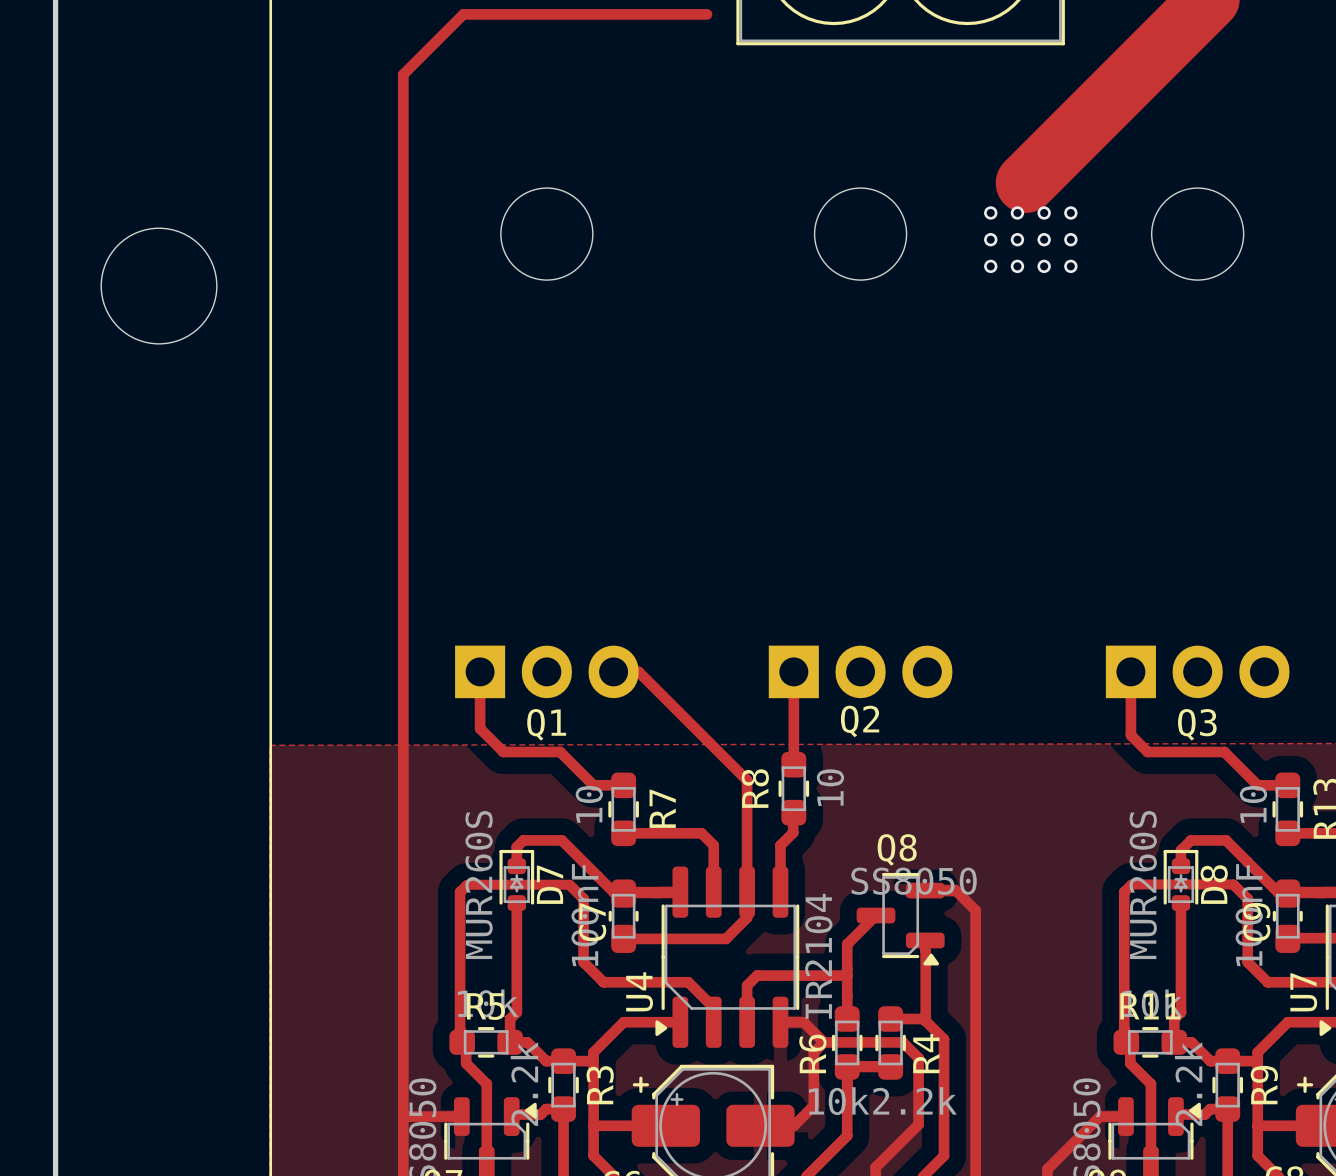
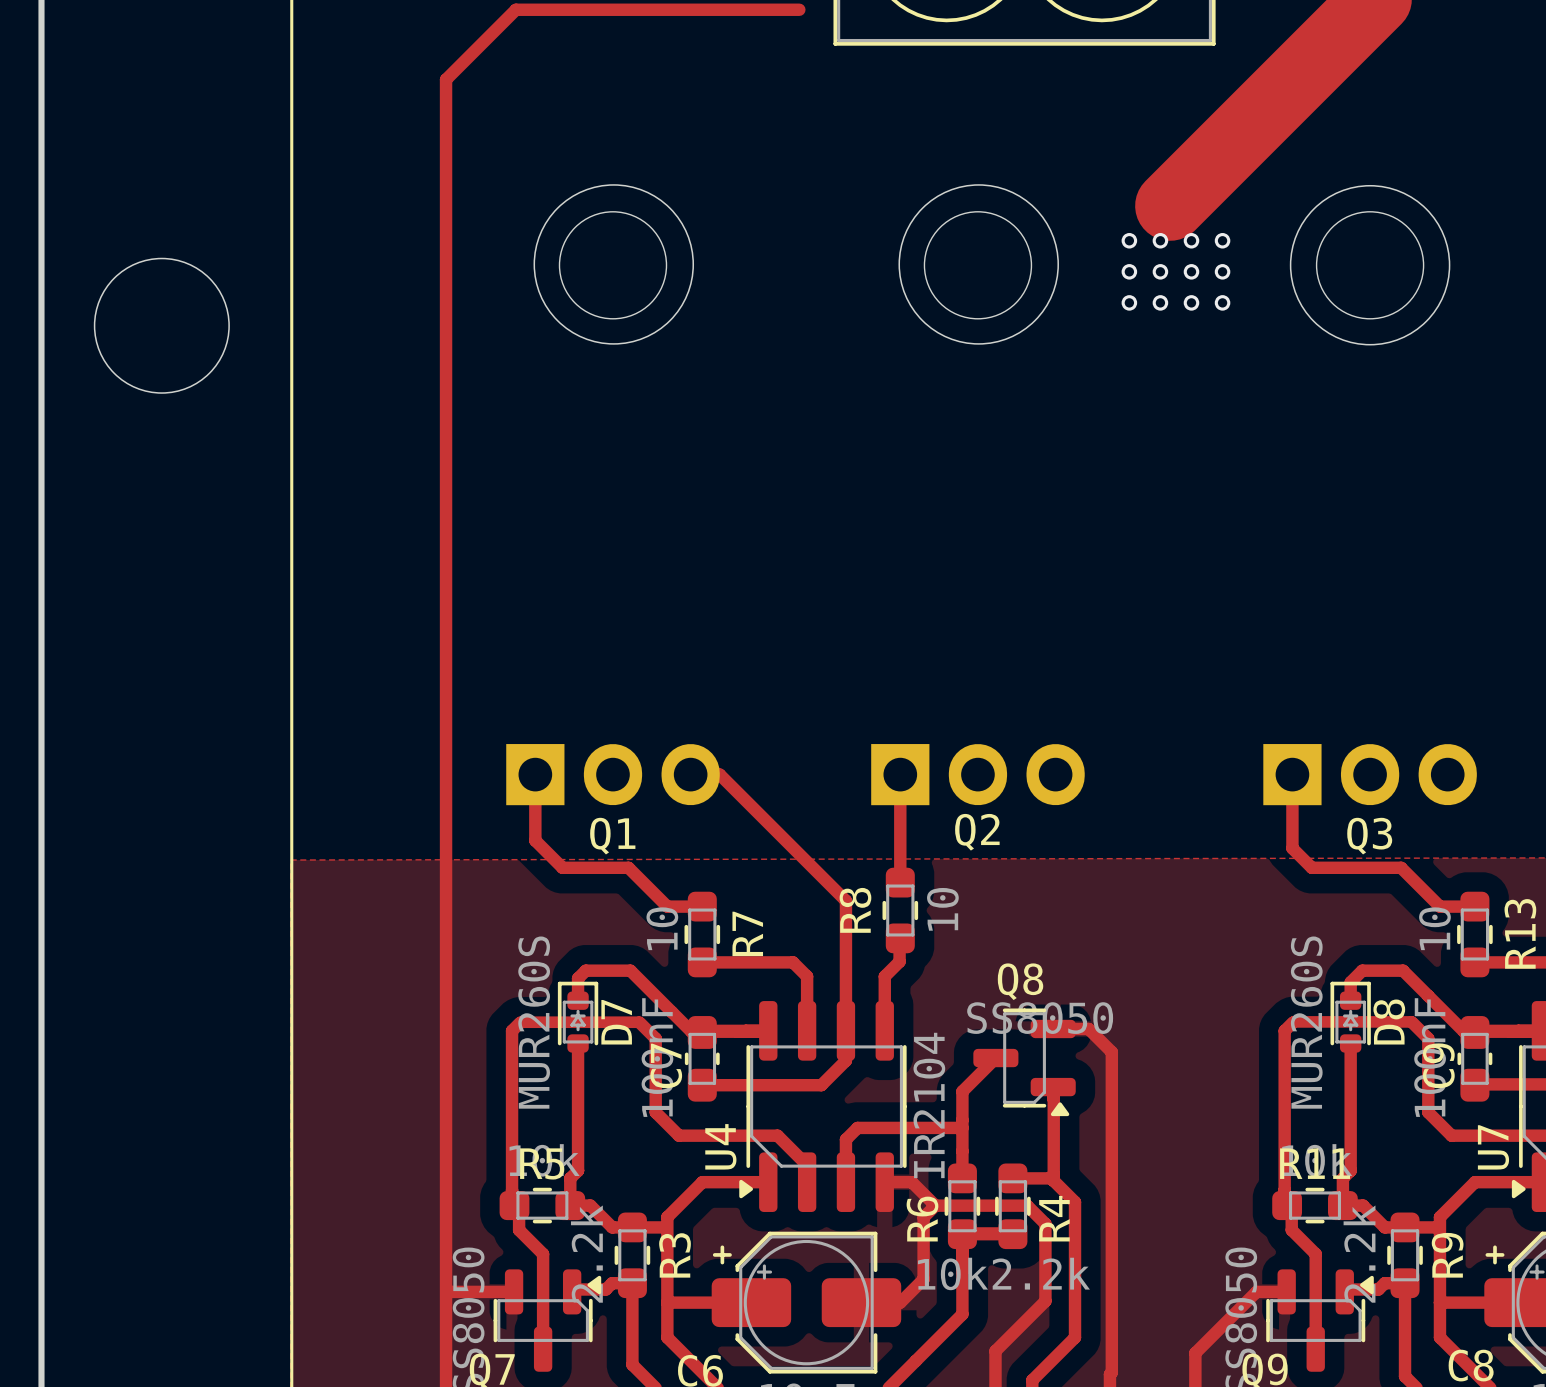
round board edge: none -> [533, 184, 695, 345]
round board edge: none -> [898, 184, 1059, 345]
round board edge: none -> [1289, 184, 1451, 346]

